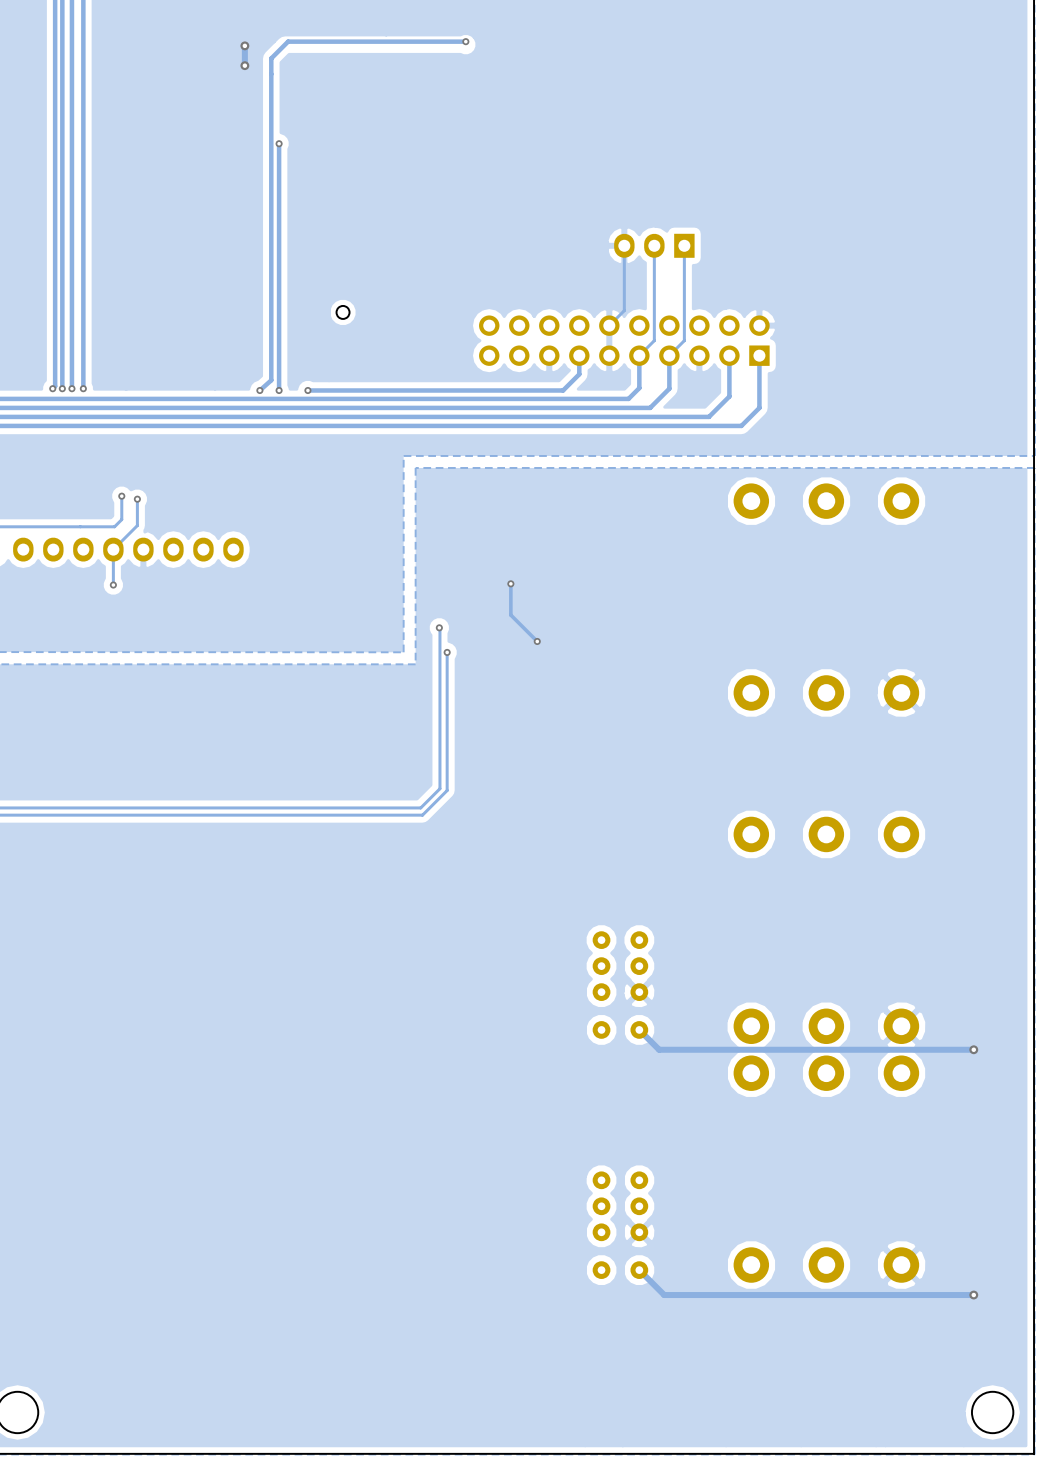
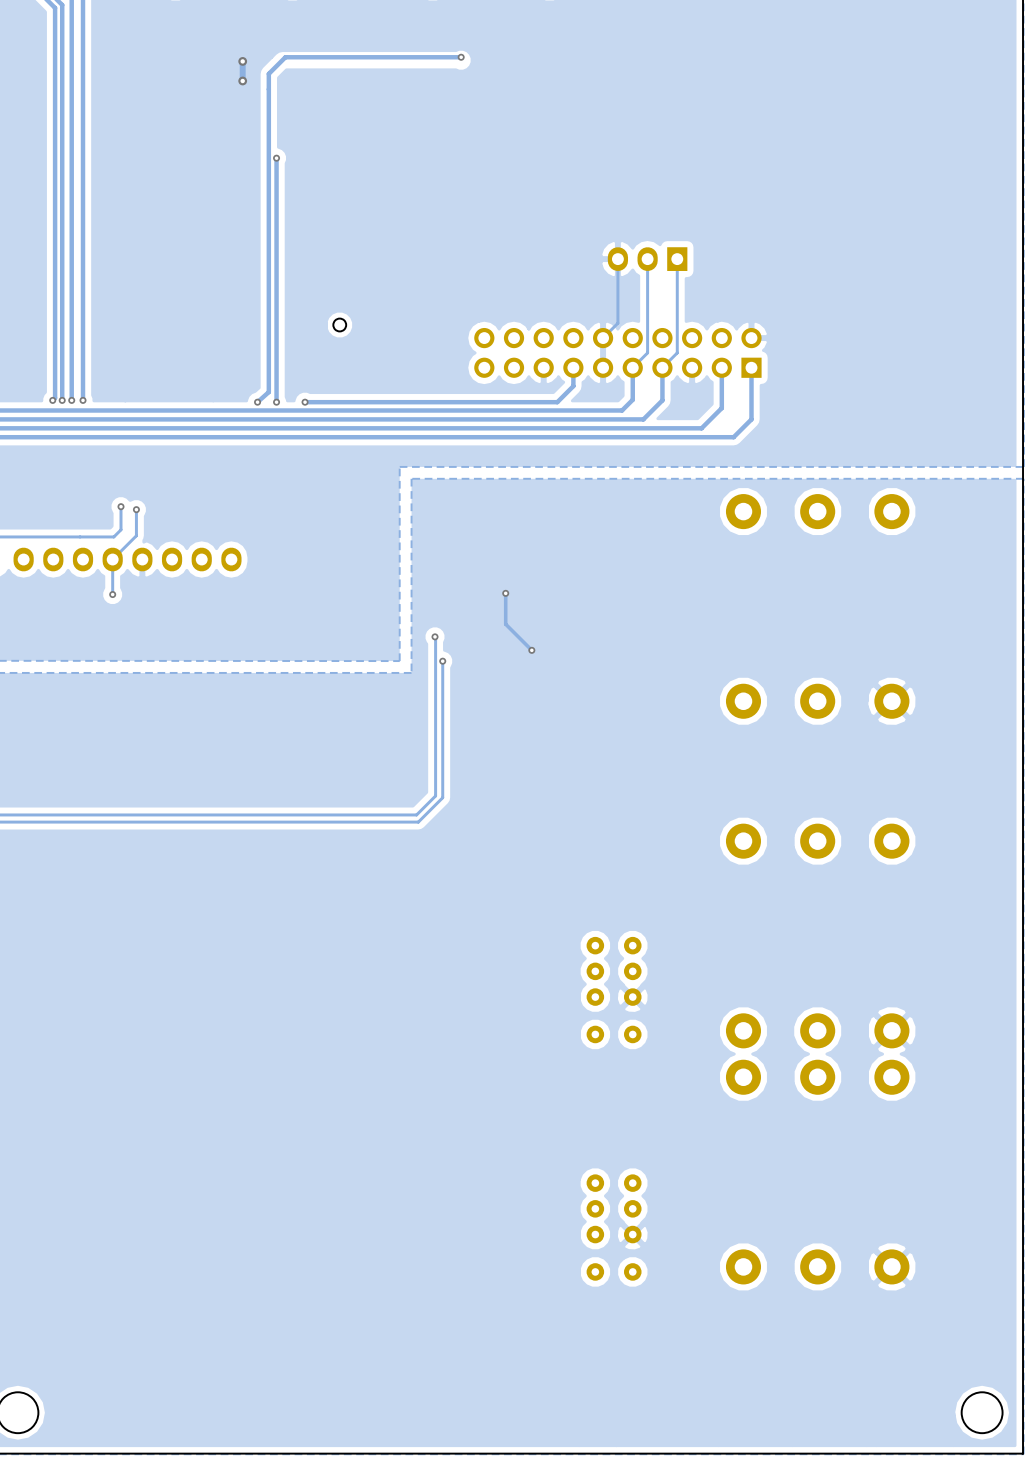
track: (639, 1029) (659, 1049) (973, 1049) -> none
via: (973, 1049) -> none
track: (639, 1270) (664, 1295) (973, 1295) -> none
via: (973, 1295) -> none

